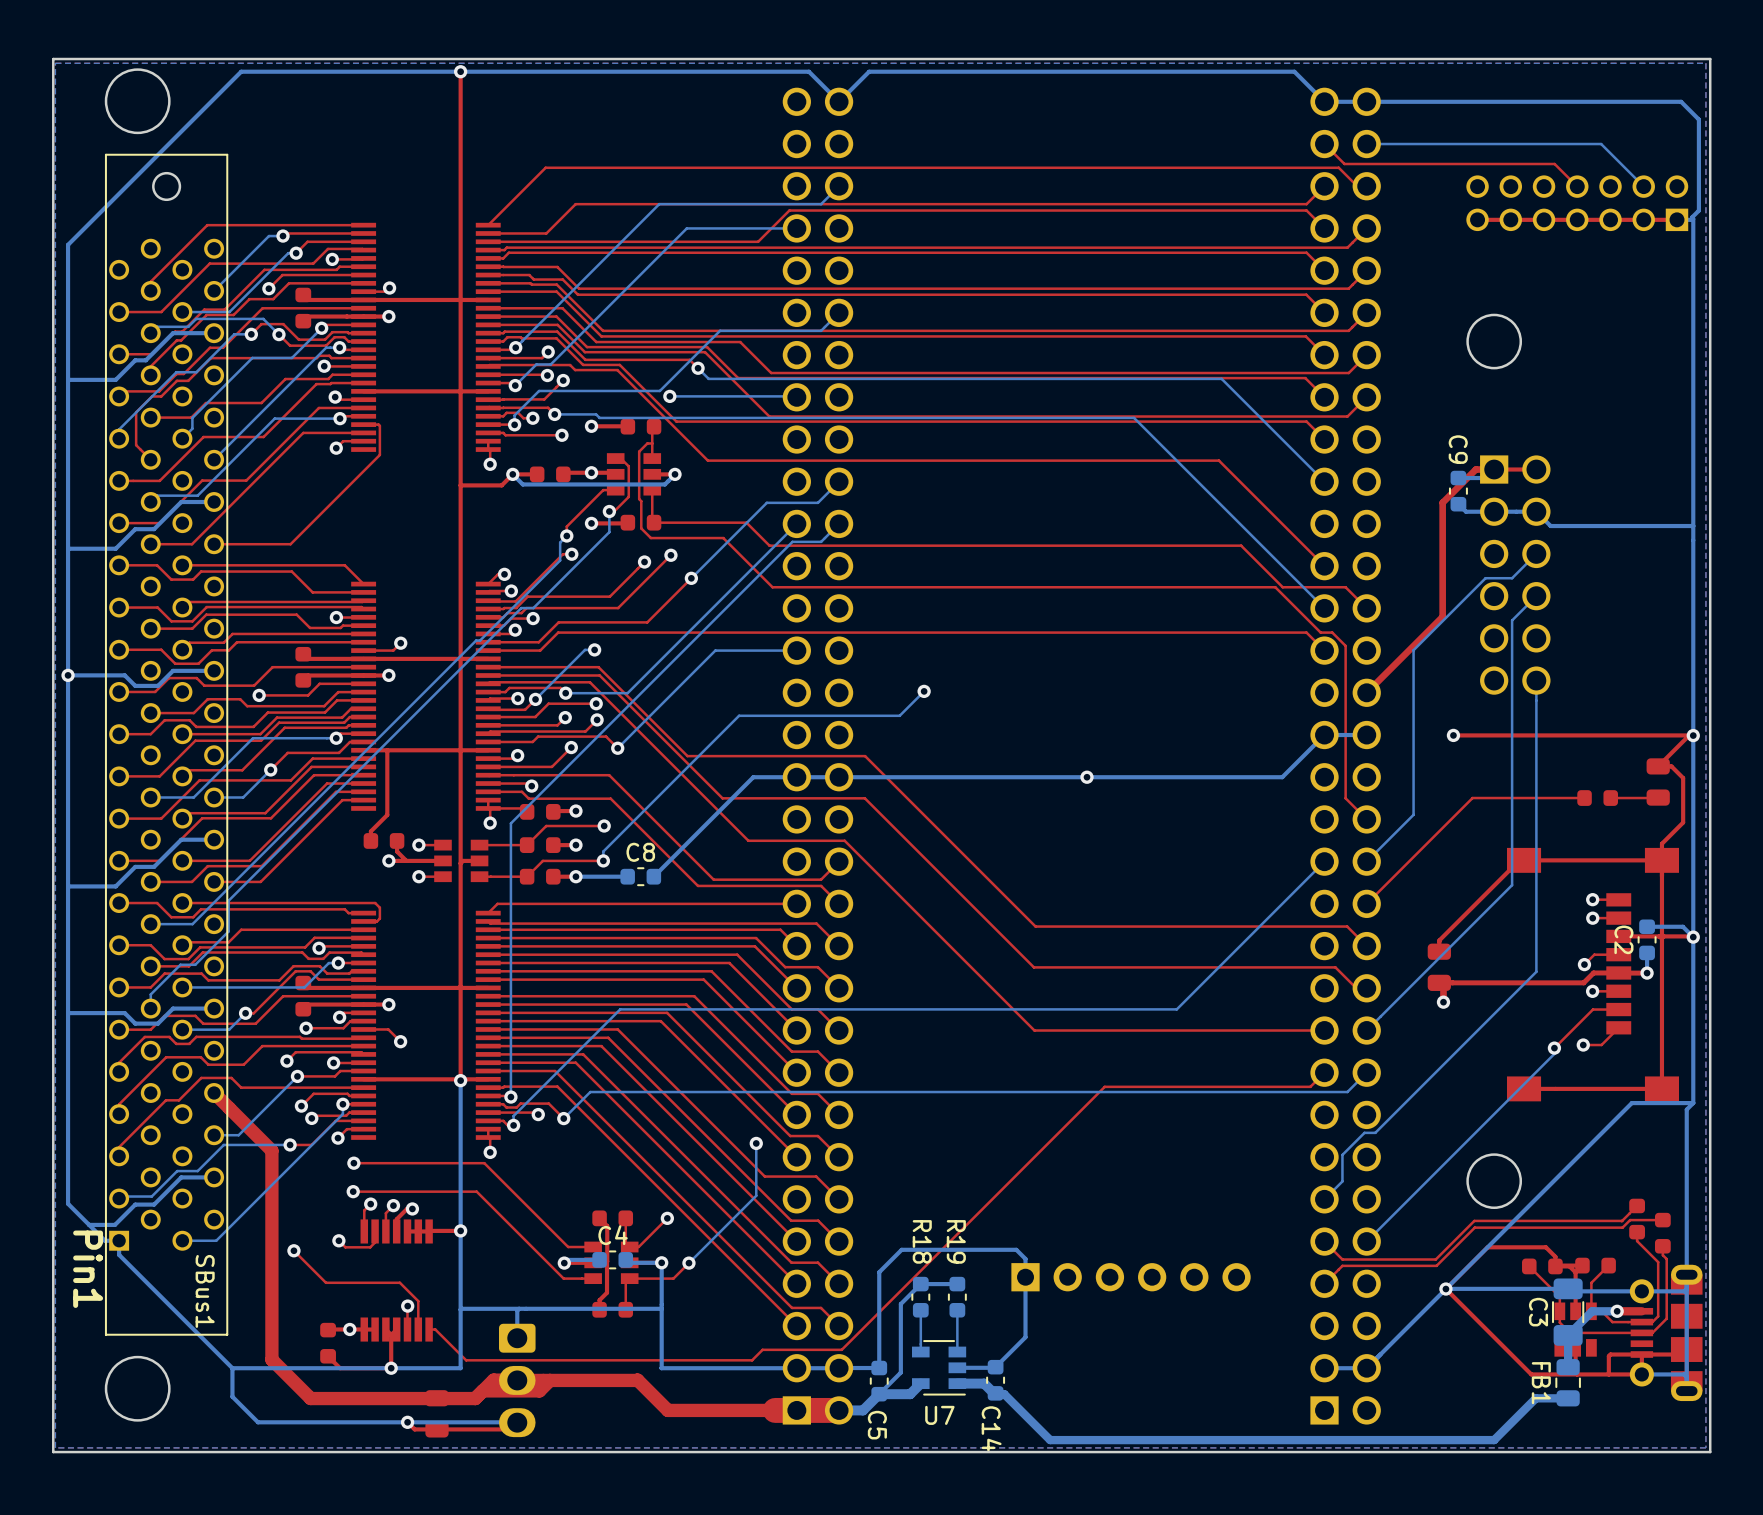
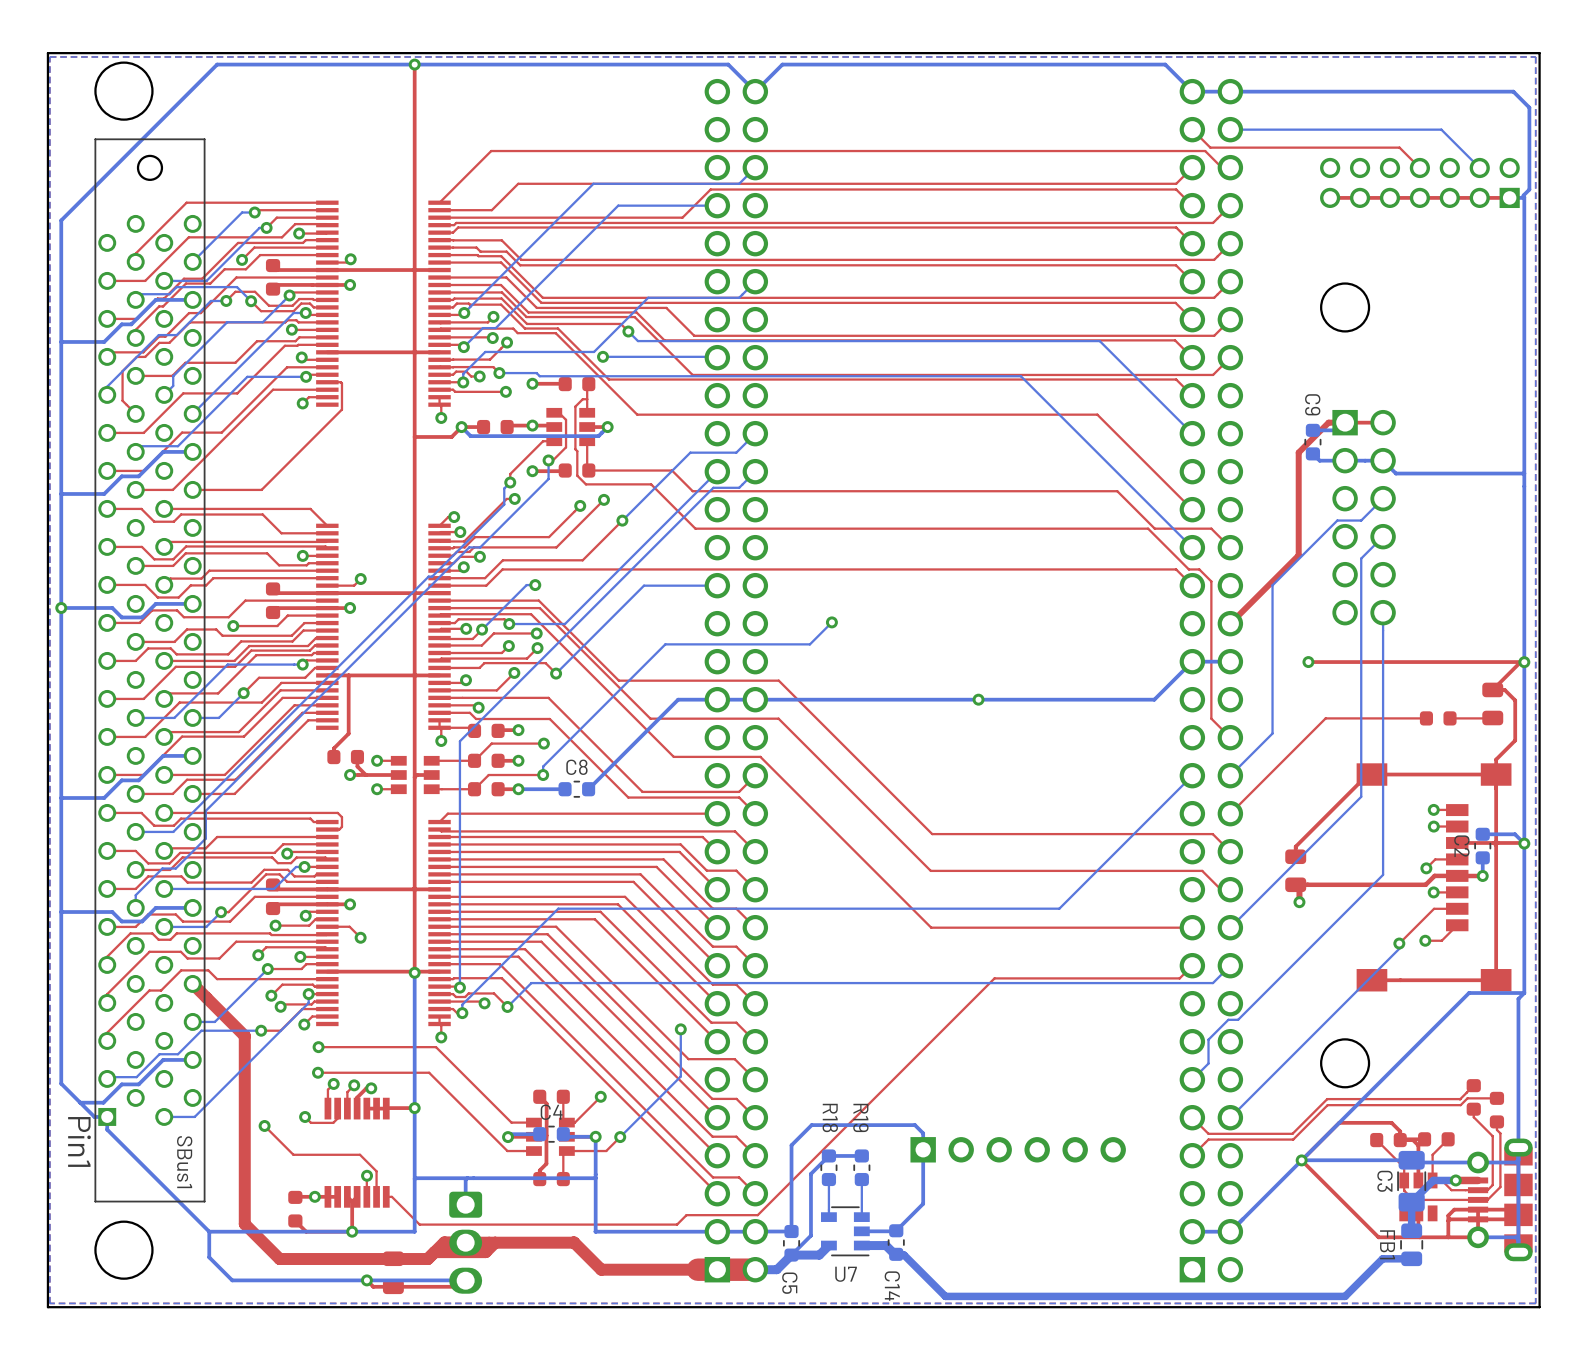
top track: none -> (1478, 1209) (1478, 1219)
top track: none -> (1513, 1209) (1454, 1209) (1448, 1215) (1448, 1220)

